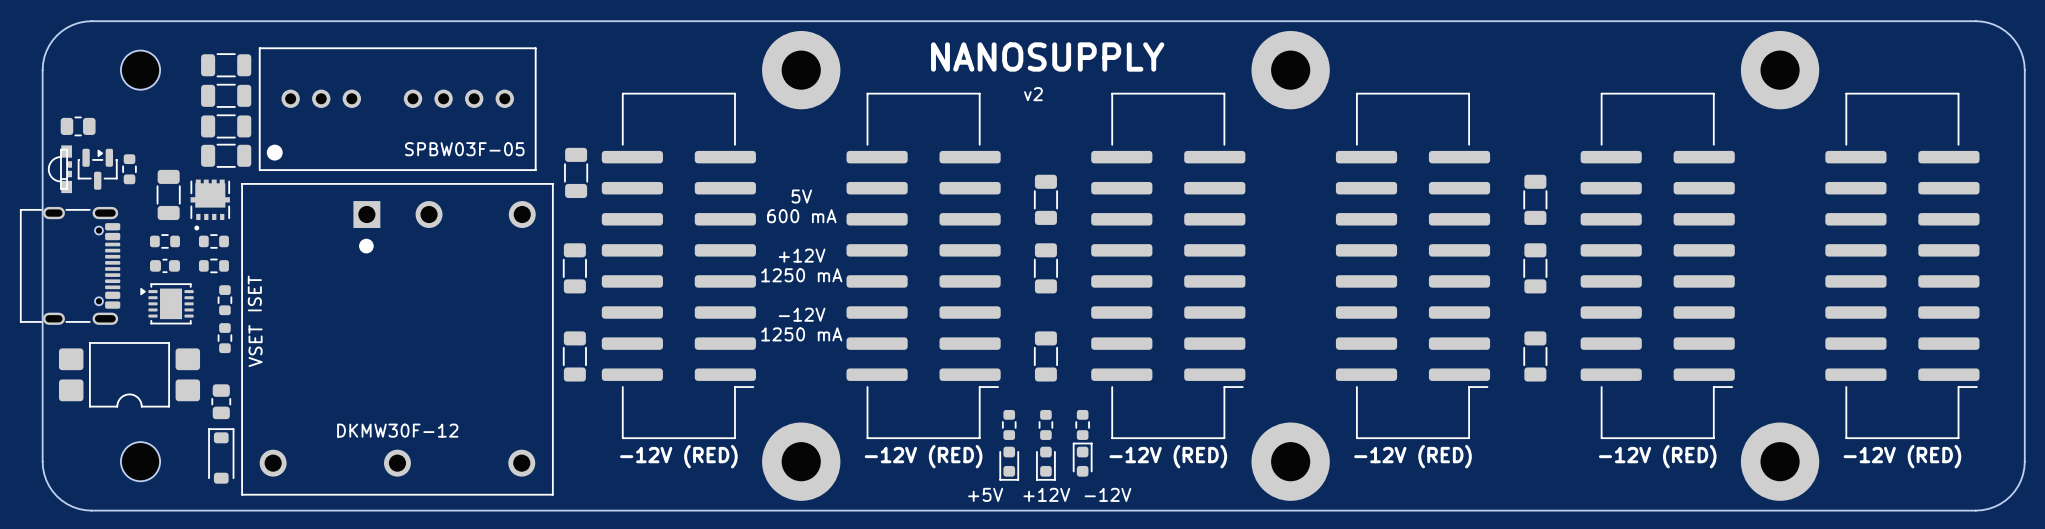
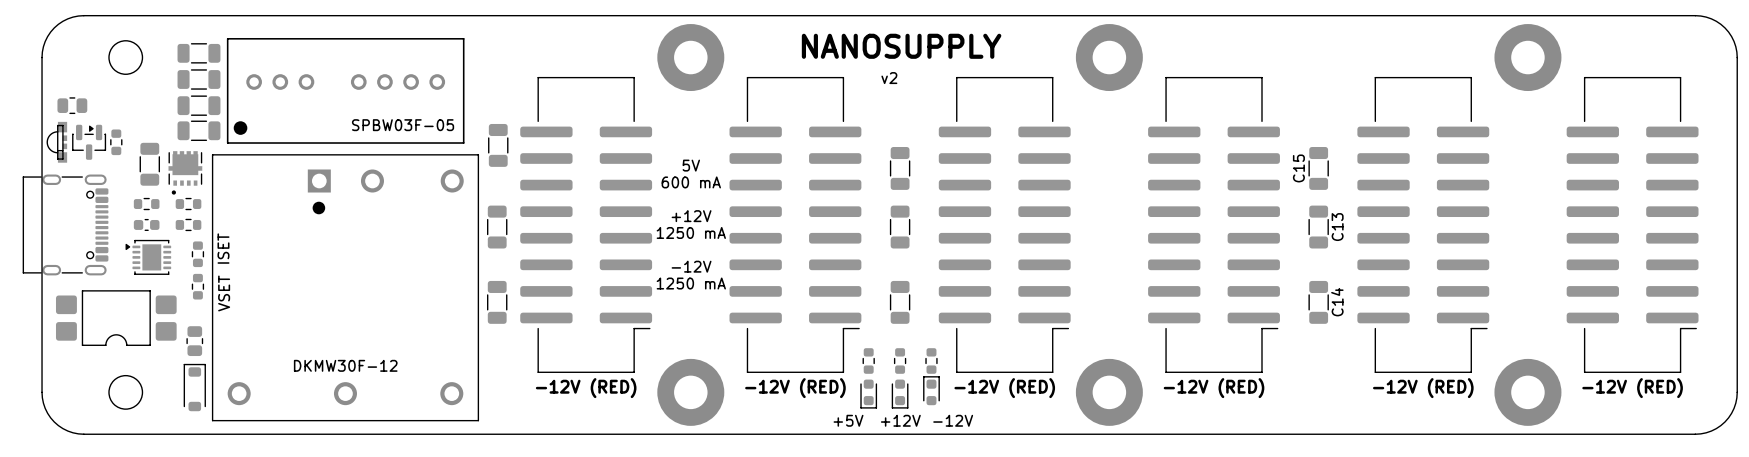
C15 name: none -> C15 (1298, 168)
C13 name: none -> C13 (1337, 227)
C14 name: none -> C14 (1337, 302)

